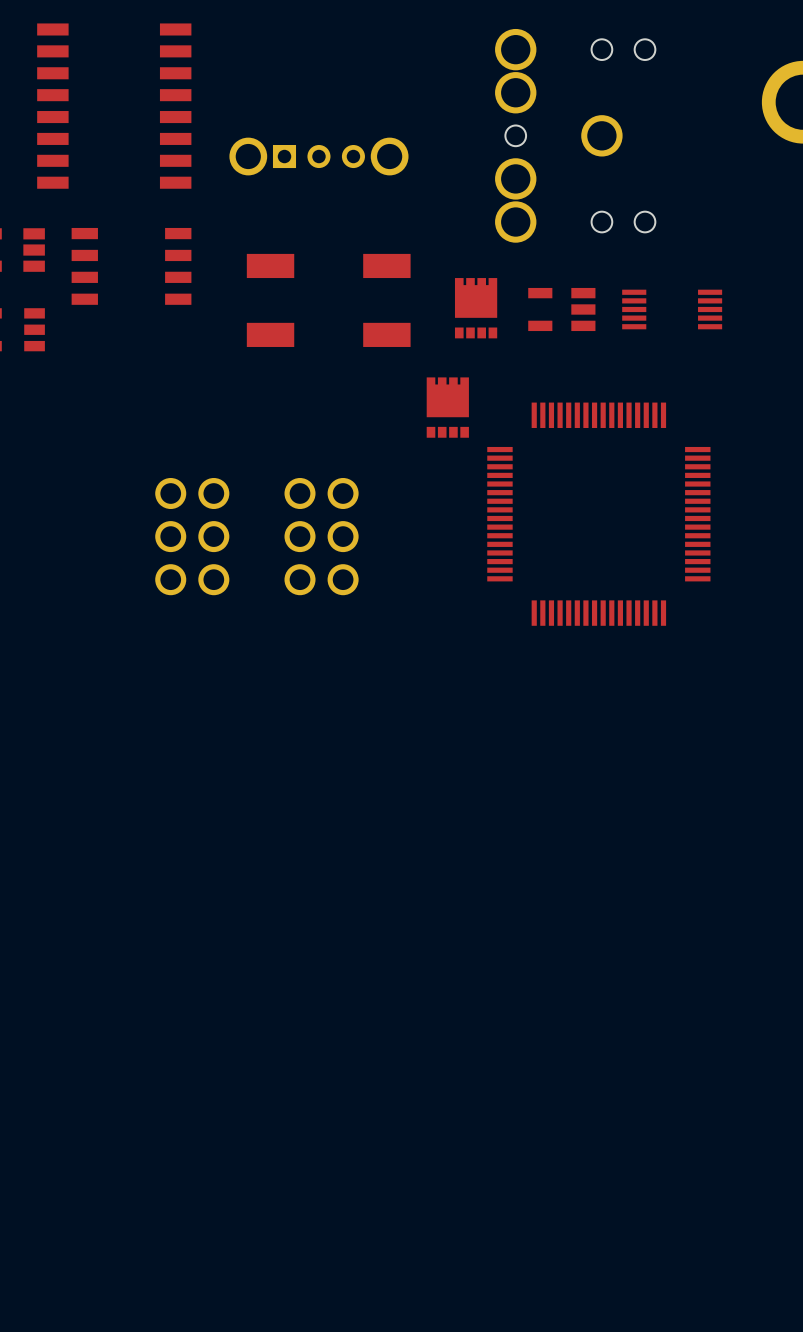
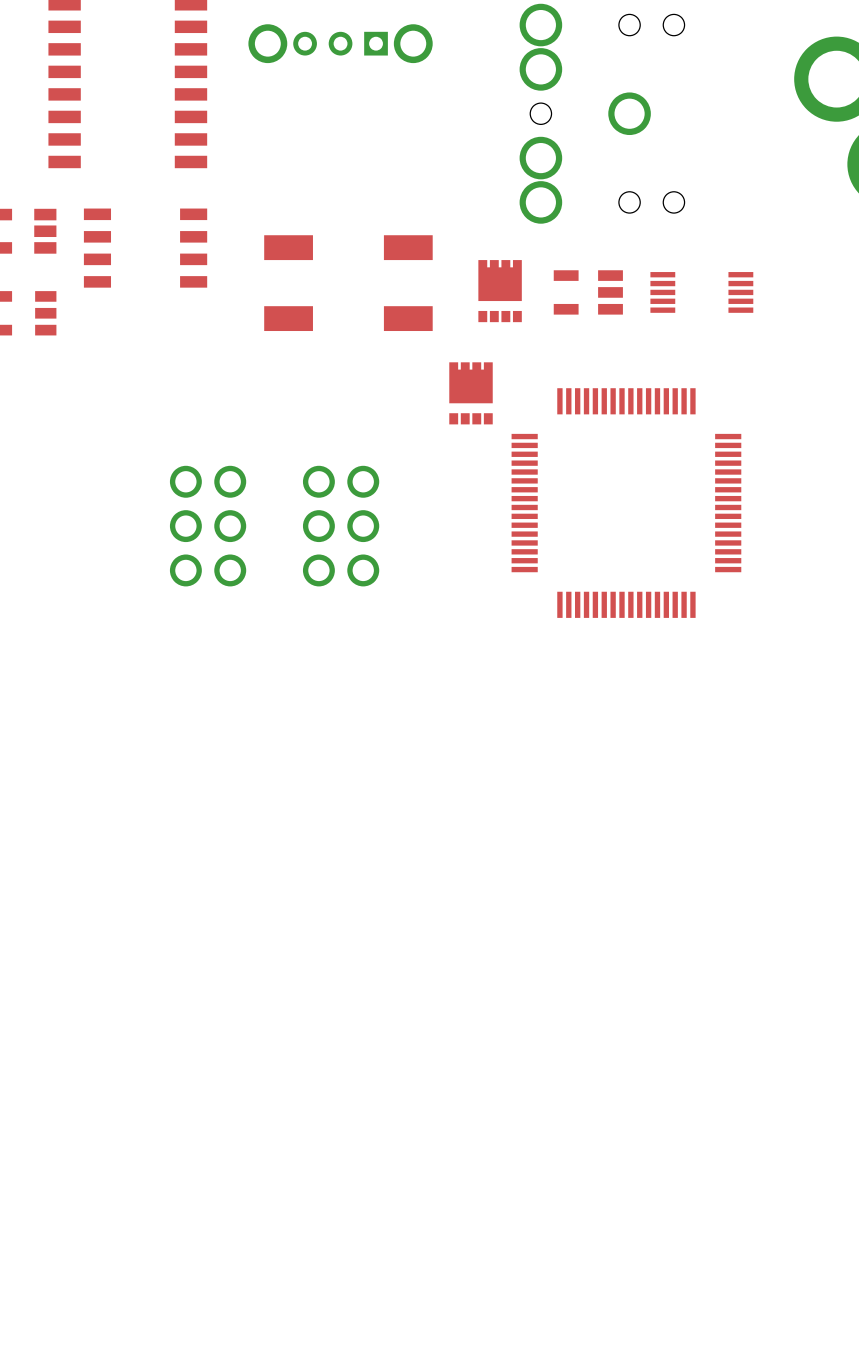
part rotation: 0° (318, 156) -> 180° (340, 43)

